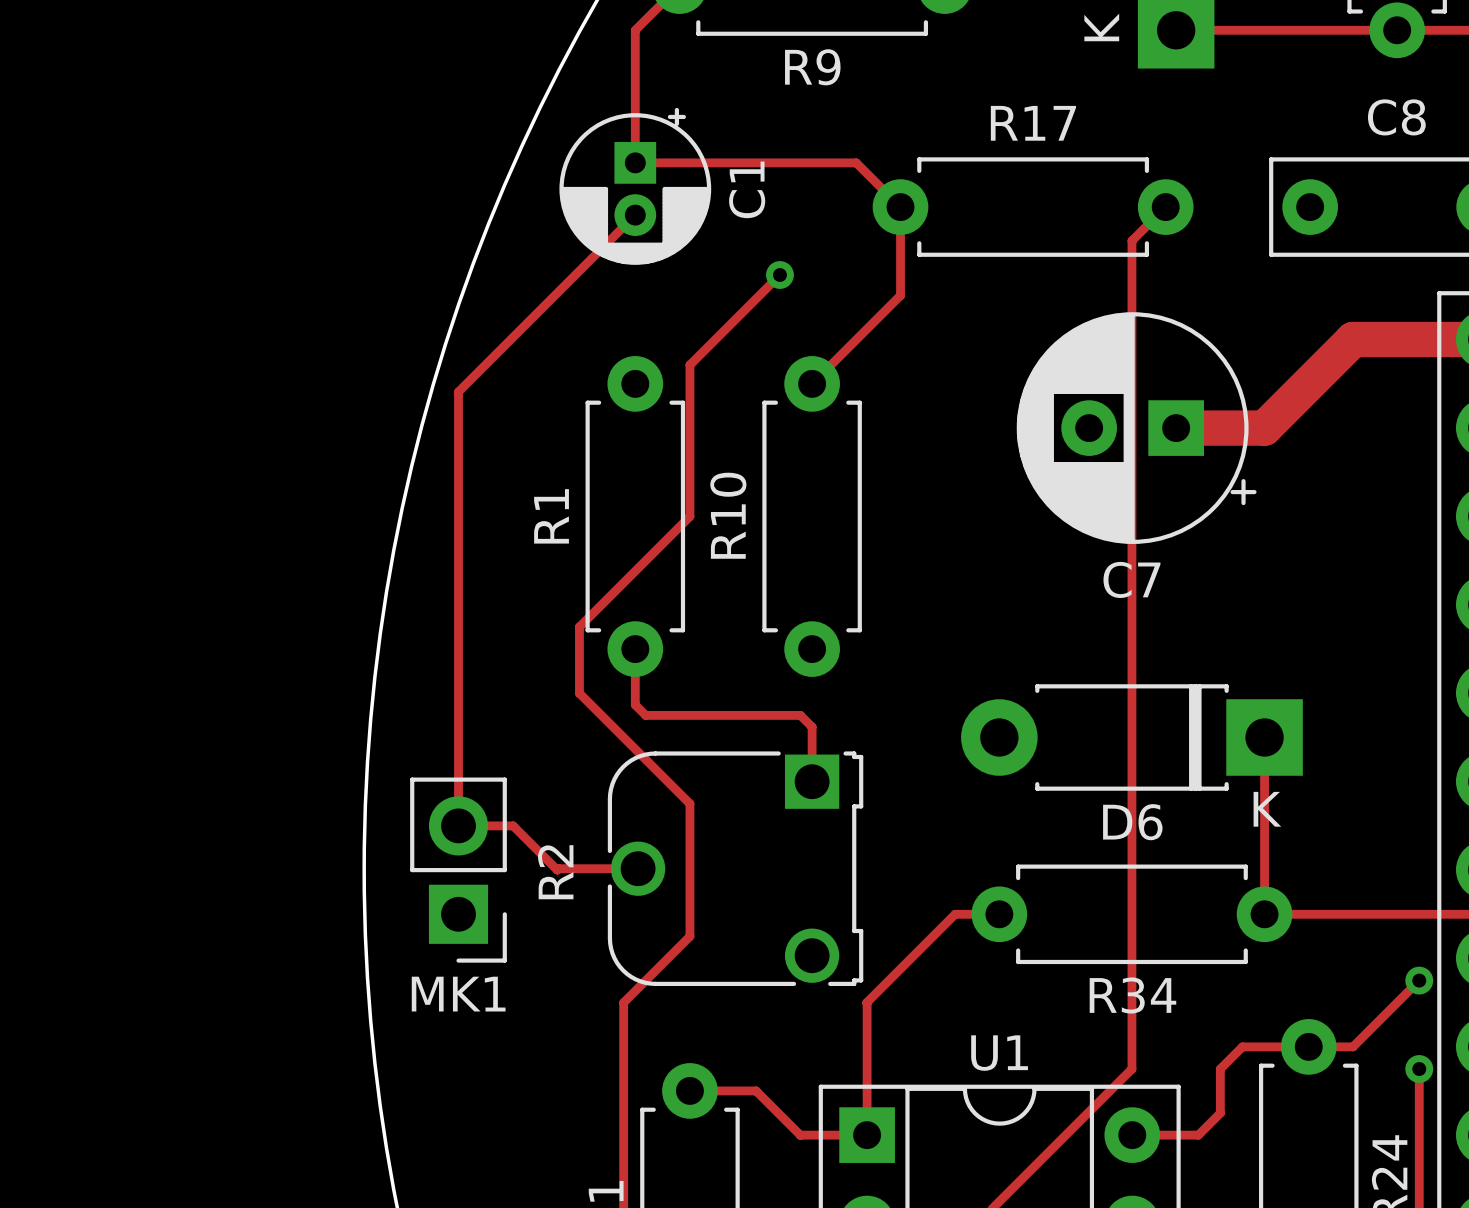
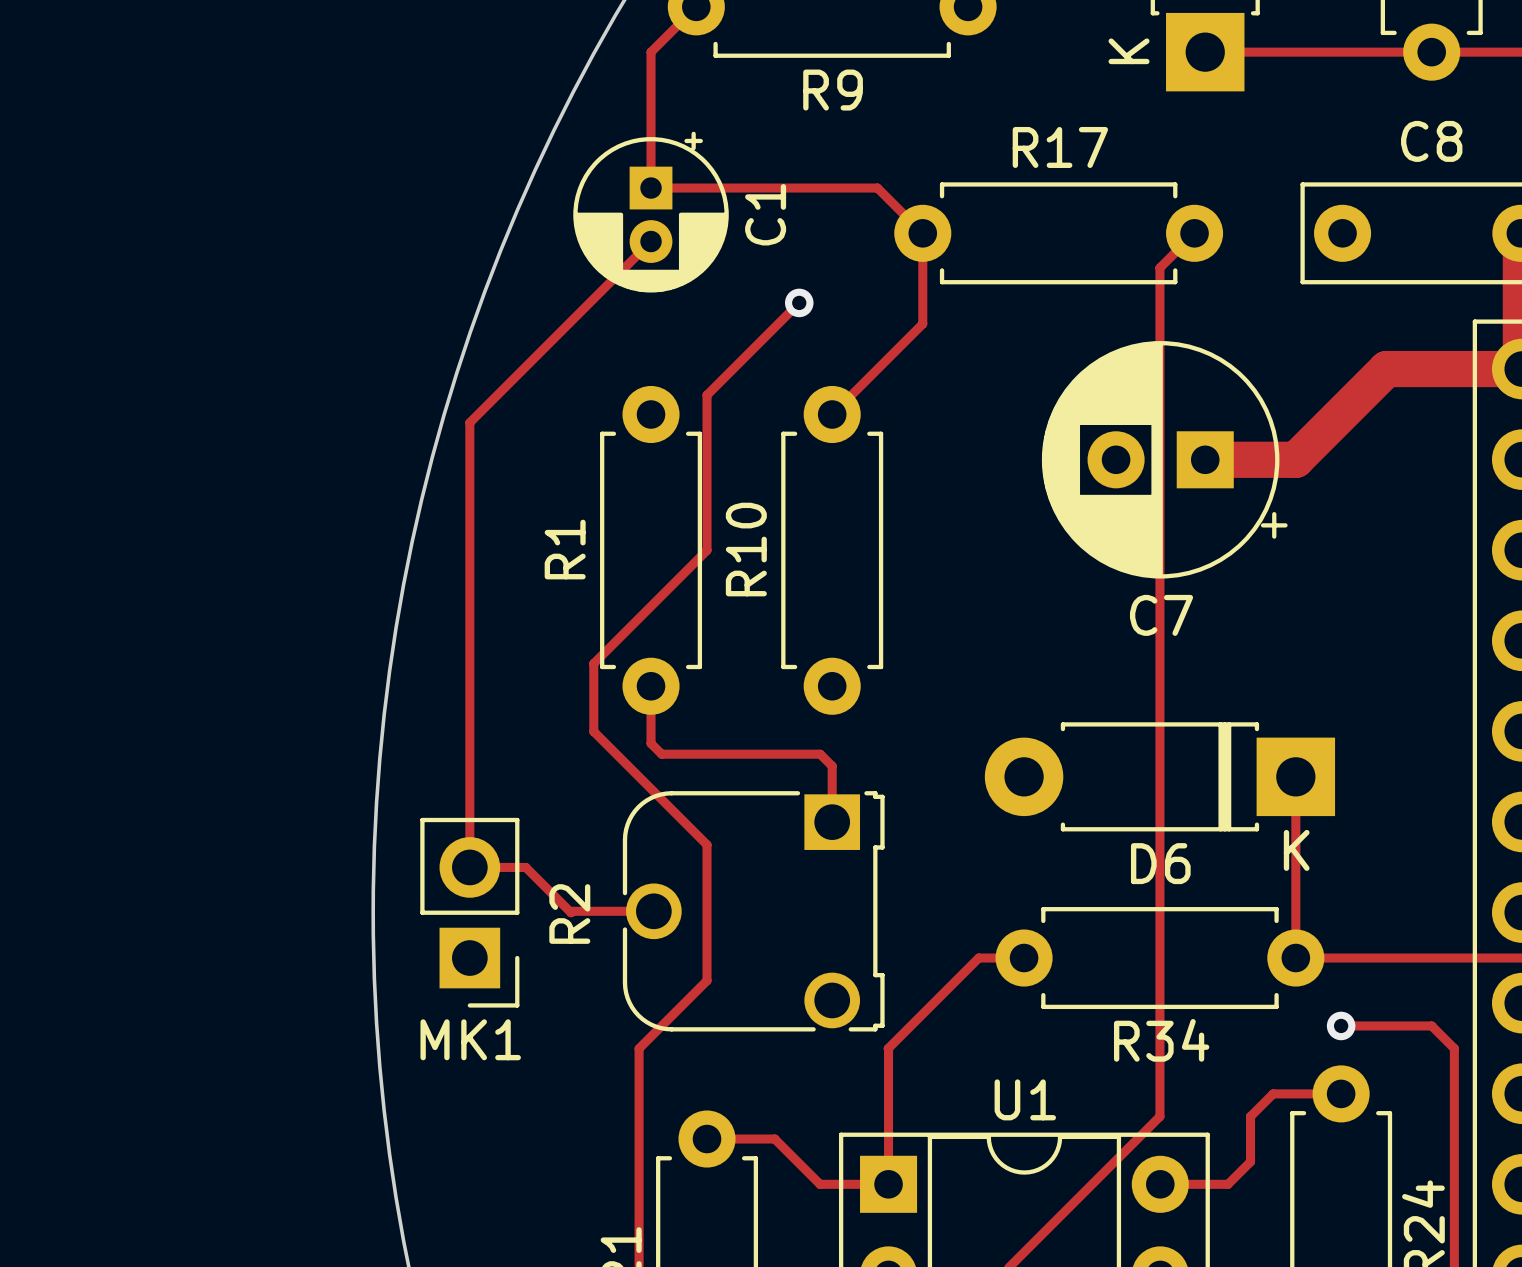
track: none -> (1341, 1025) (1431, 1025) (1454, 1048) (1454, 1116)
via: none -> (1341, 1025)
track: (1419, 980) (1352, 1046) (1308, 1046) -> none
via: (1419, 980) -> none
via: (1419, 1069) -> none

